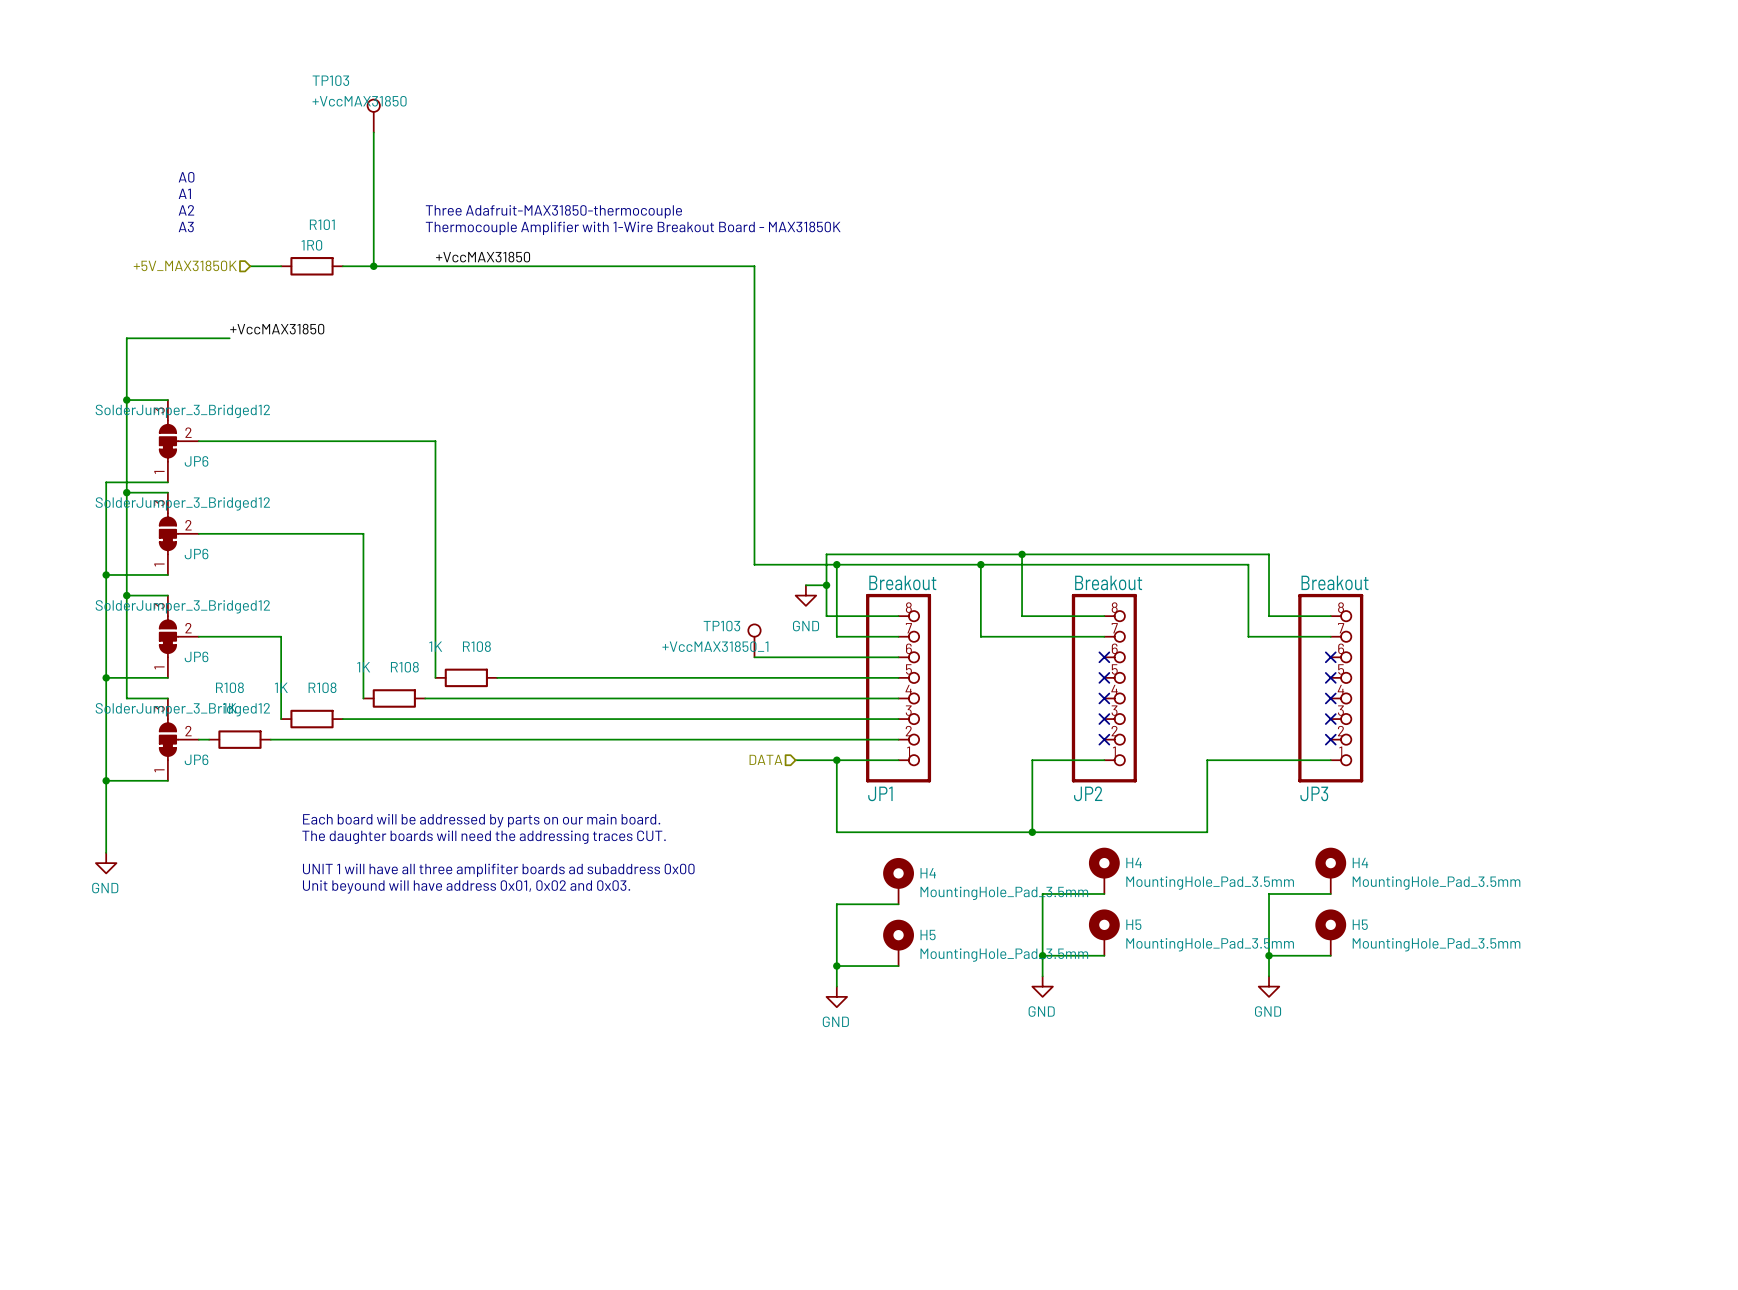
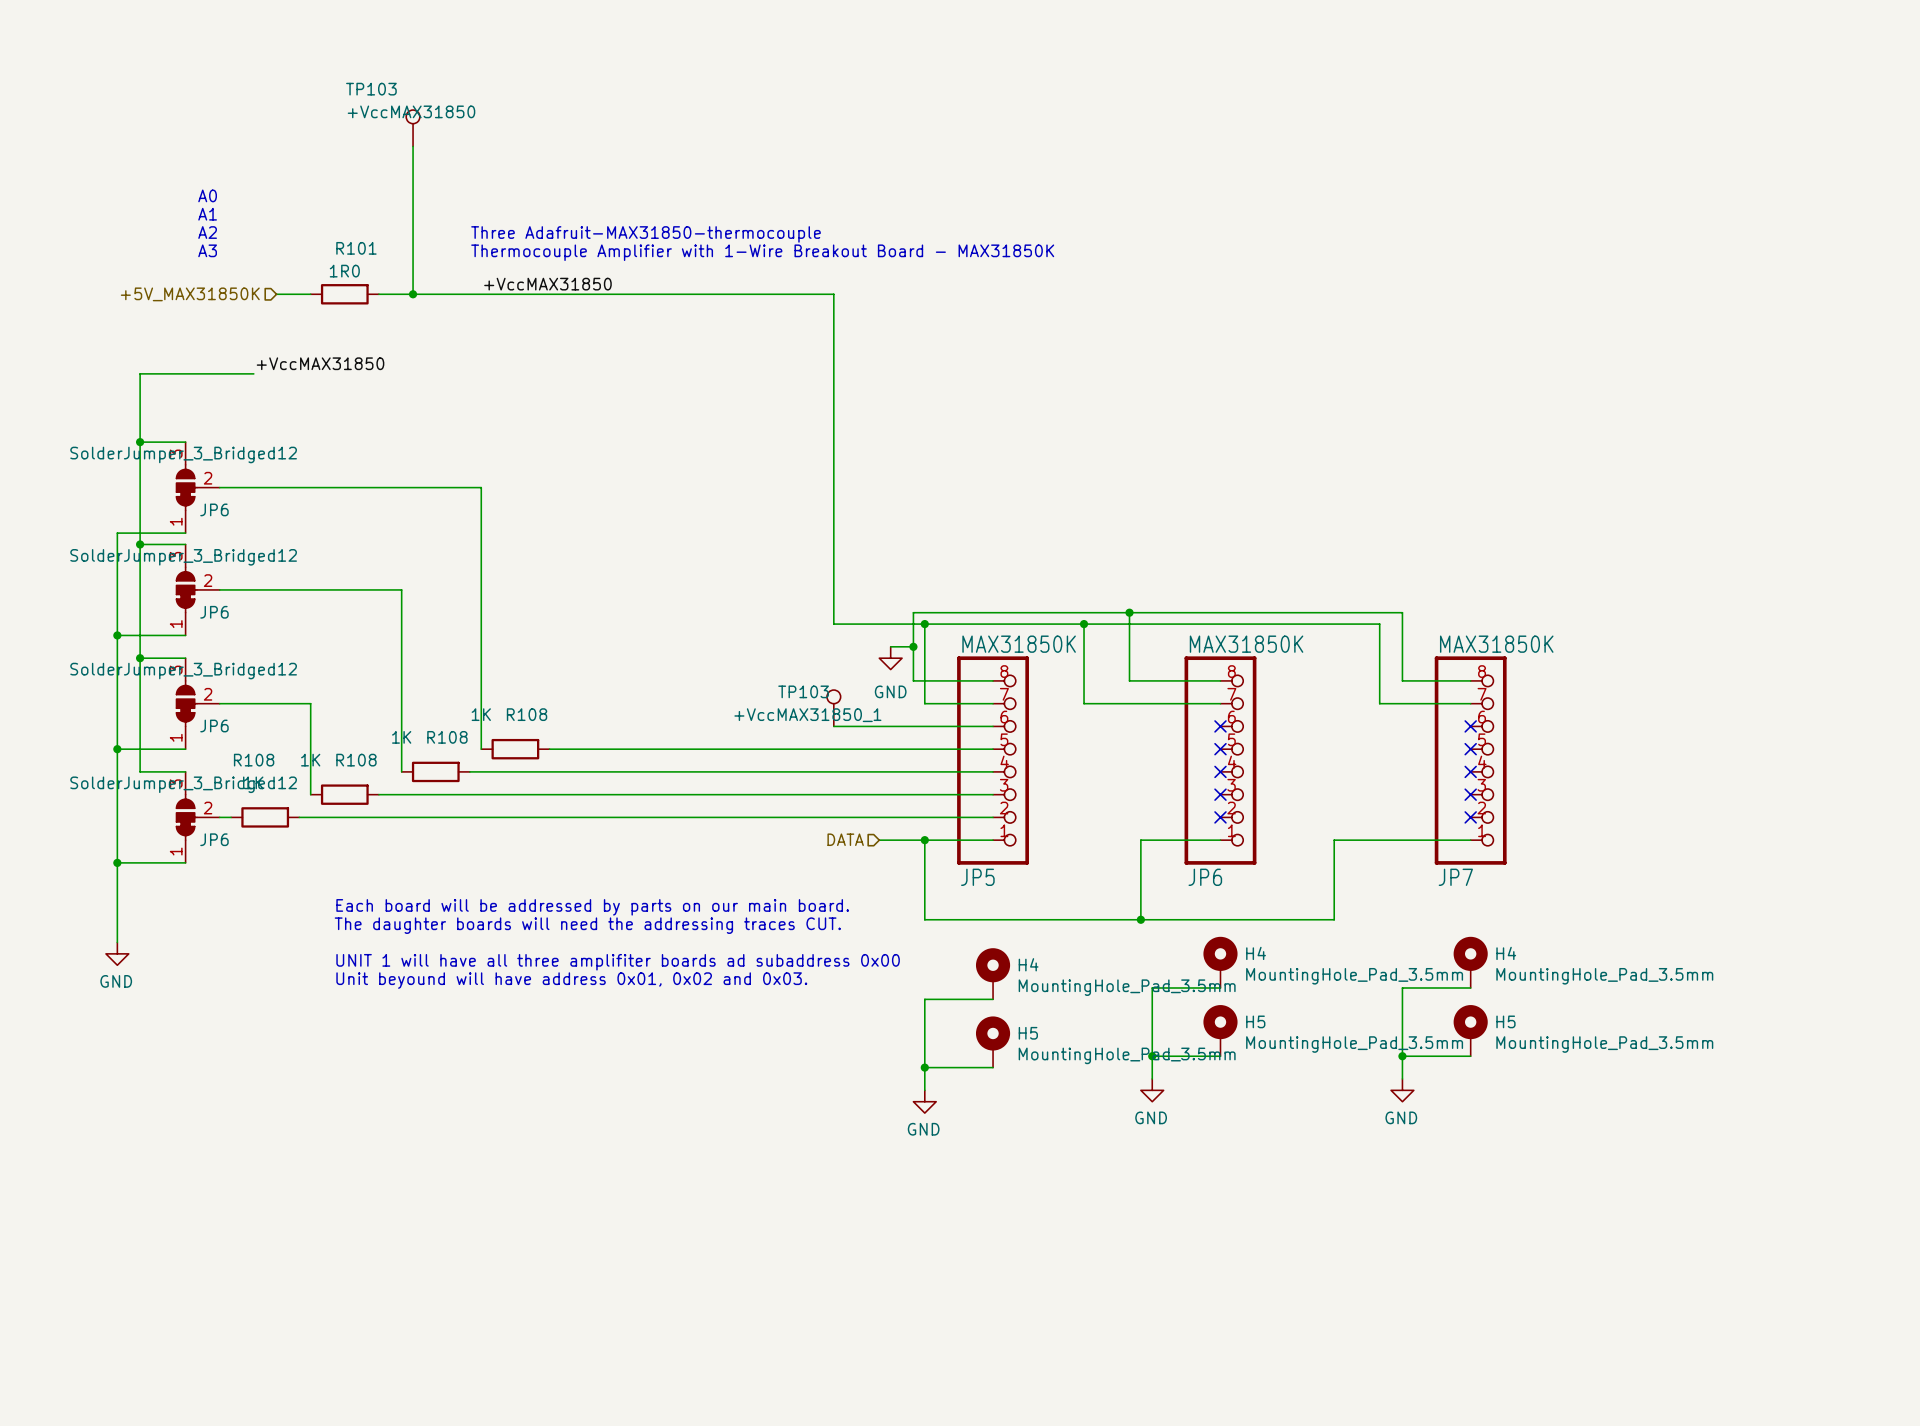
JP1 value: Breakout (902, 582) -> MAX31850K (1019, 644)
JP2 value: Breakout (1108, 582) -> MAX31850K (1246, 644)
JP3 value: Breakout (1335, 582) -> MAX31850K (1496, 644)
JP1 name: JP1 (880, 793) -> JP5 (977, 877)
JP2 name: JP2 (1088, 793) -> JP6 (1205, 877)
JP3 name: JP3 (1314, 793) -> JP7 (1455, 877)

